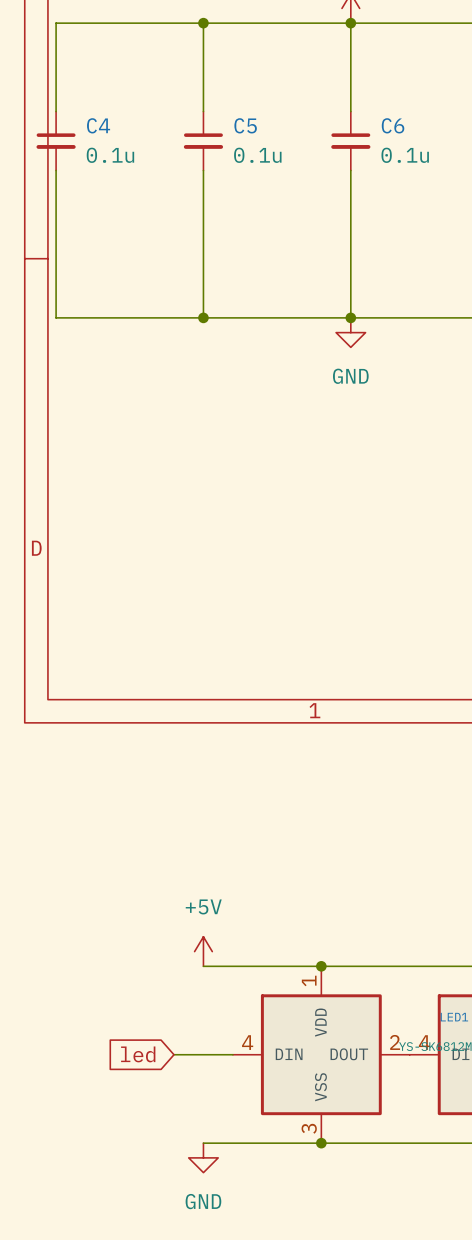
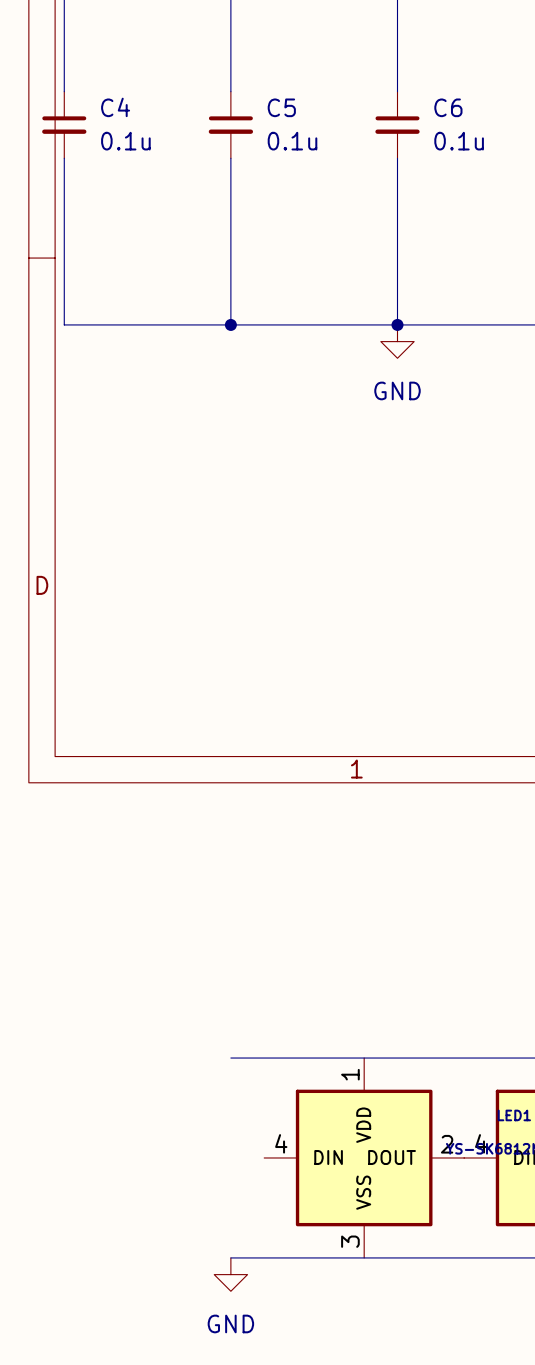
power symbol: +5V (203, 951) -> none
junction: (321, 966) -> none
global label: led (138, 1054) -> none
wire: (173, 1054) (232, 1054) -> none
junction: (321, 1143) -> none

